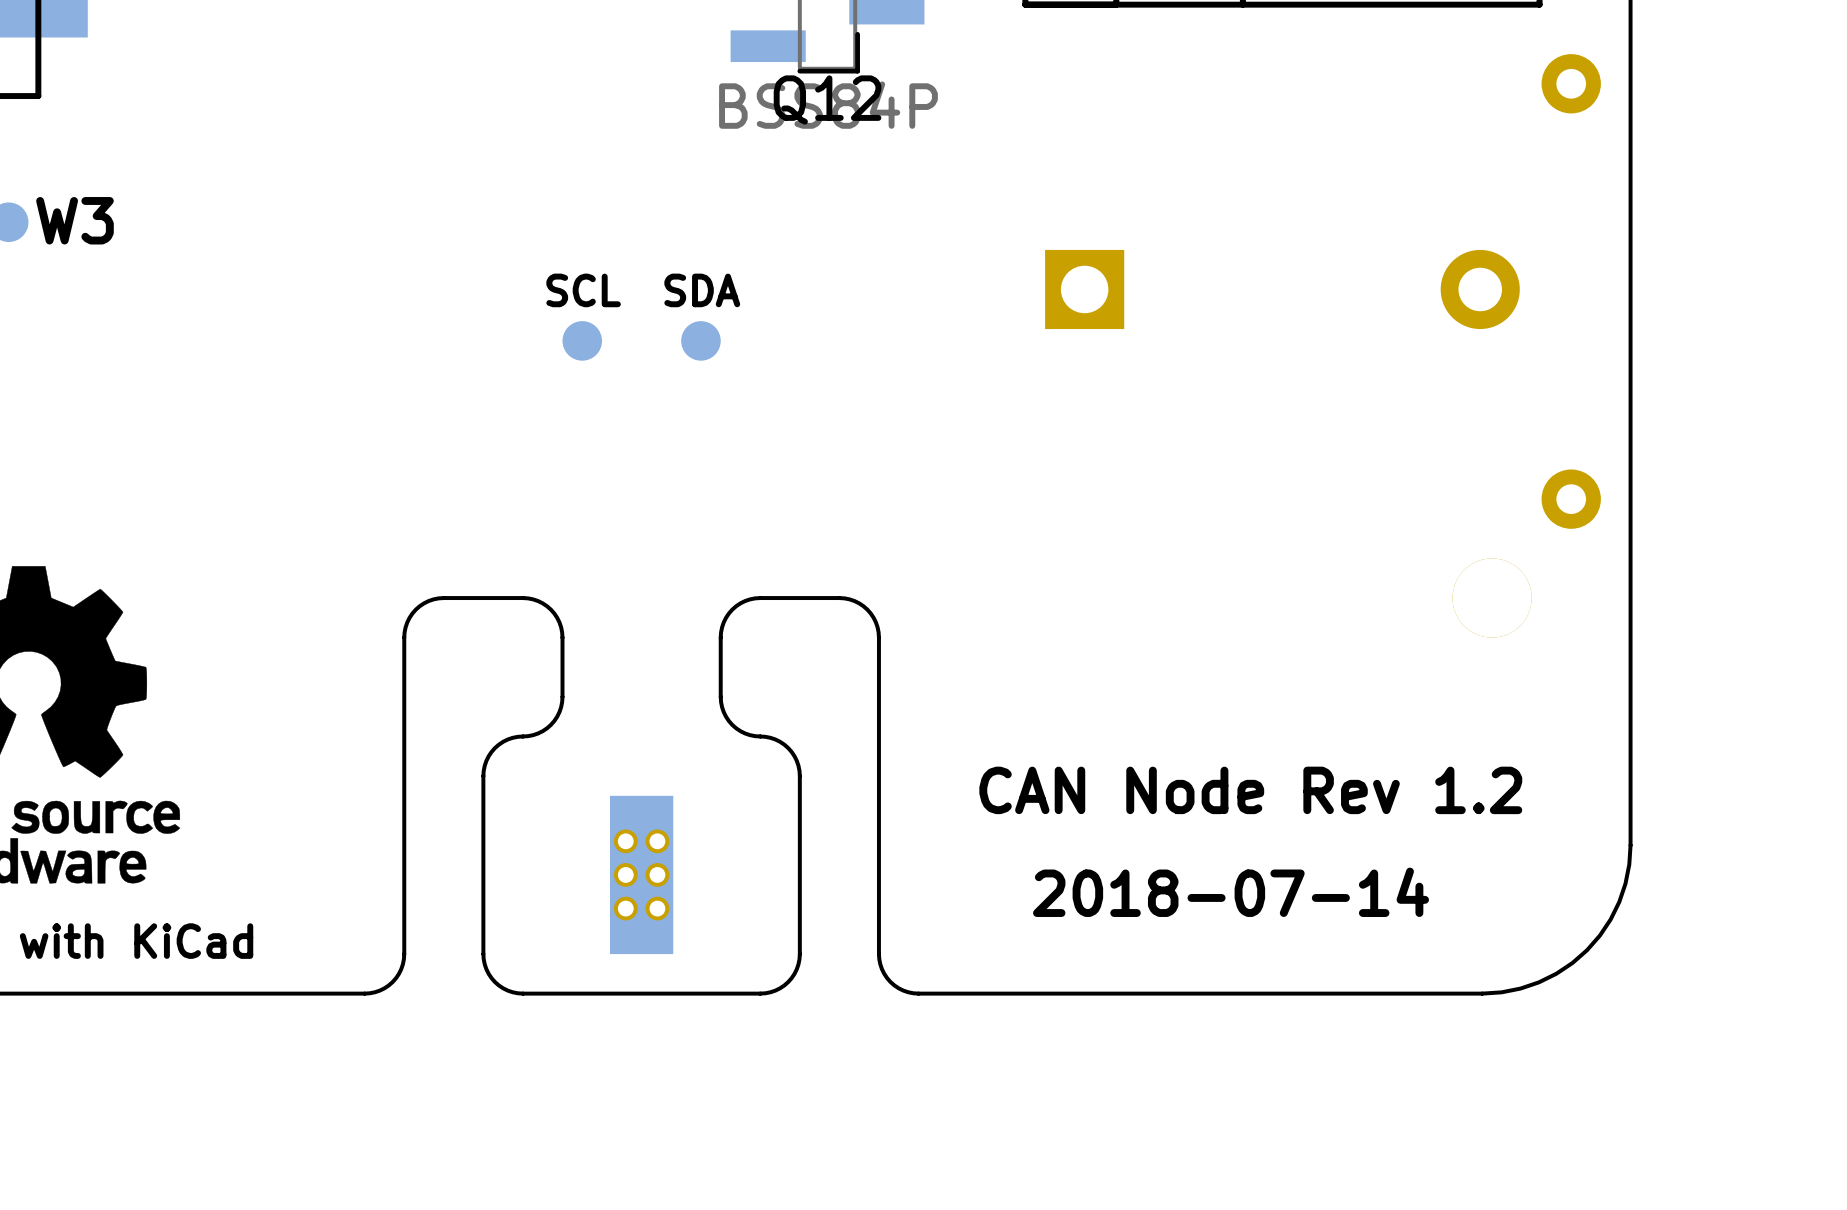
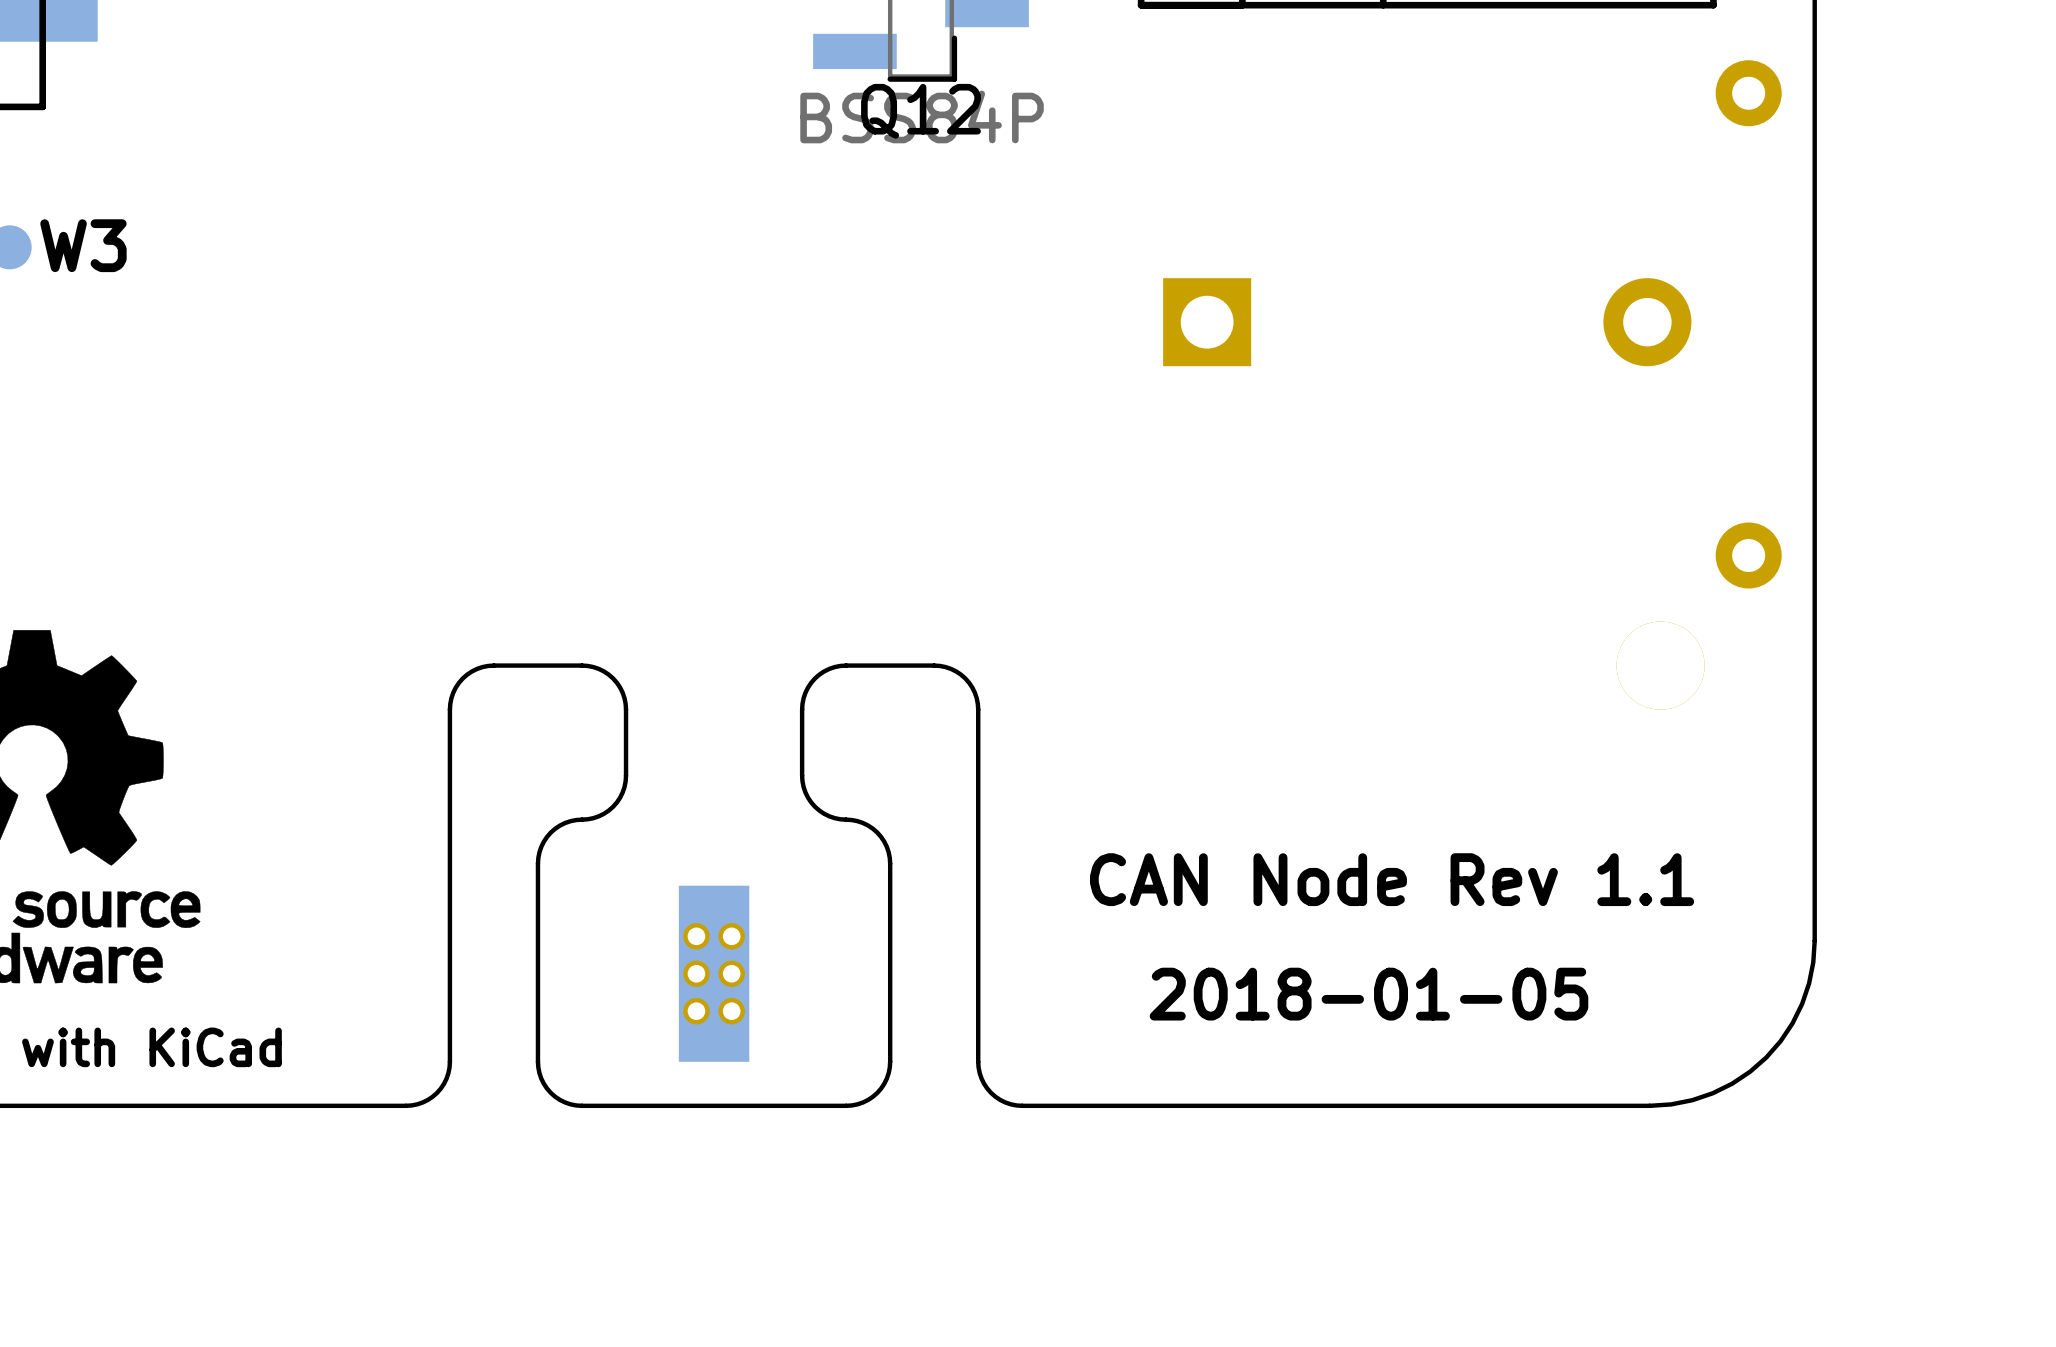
part: SCL (582, 340) -> none
part: SDA (700, 340) -> none
text: CAN Node Rev 1.2 (1250, 790) -> CAN Node Rev 1.1 (1392, 879)
text: 2018-07-14 (1231, 892) -> 2018-01-05 (1369, 994)

